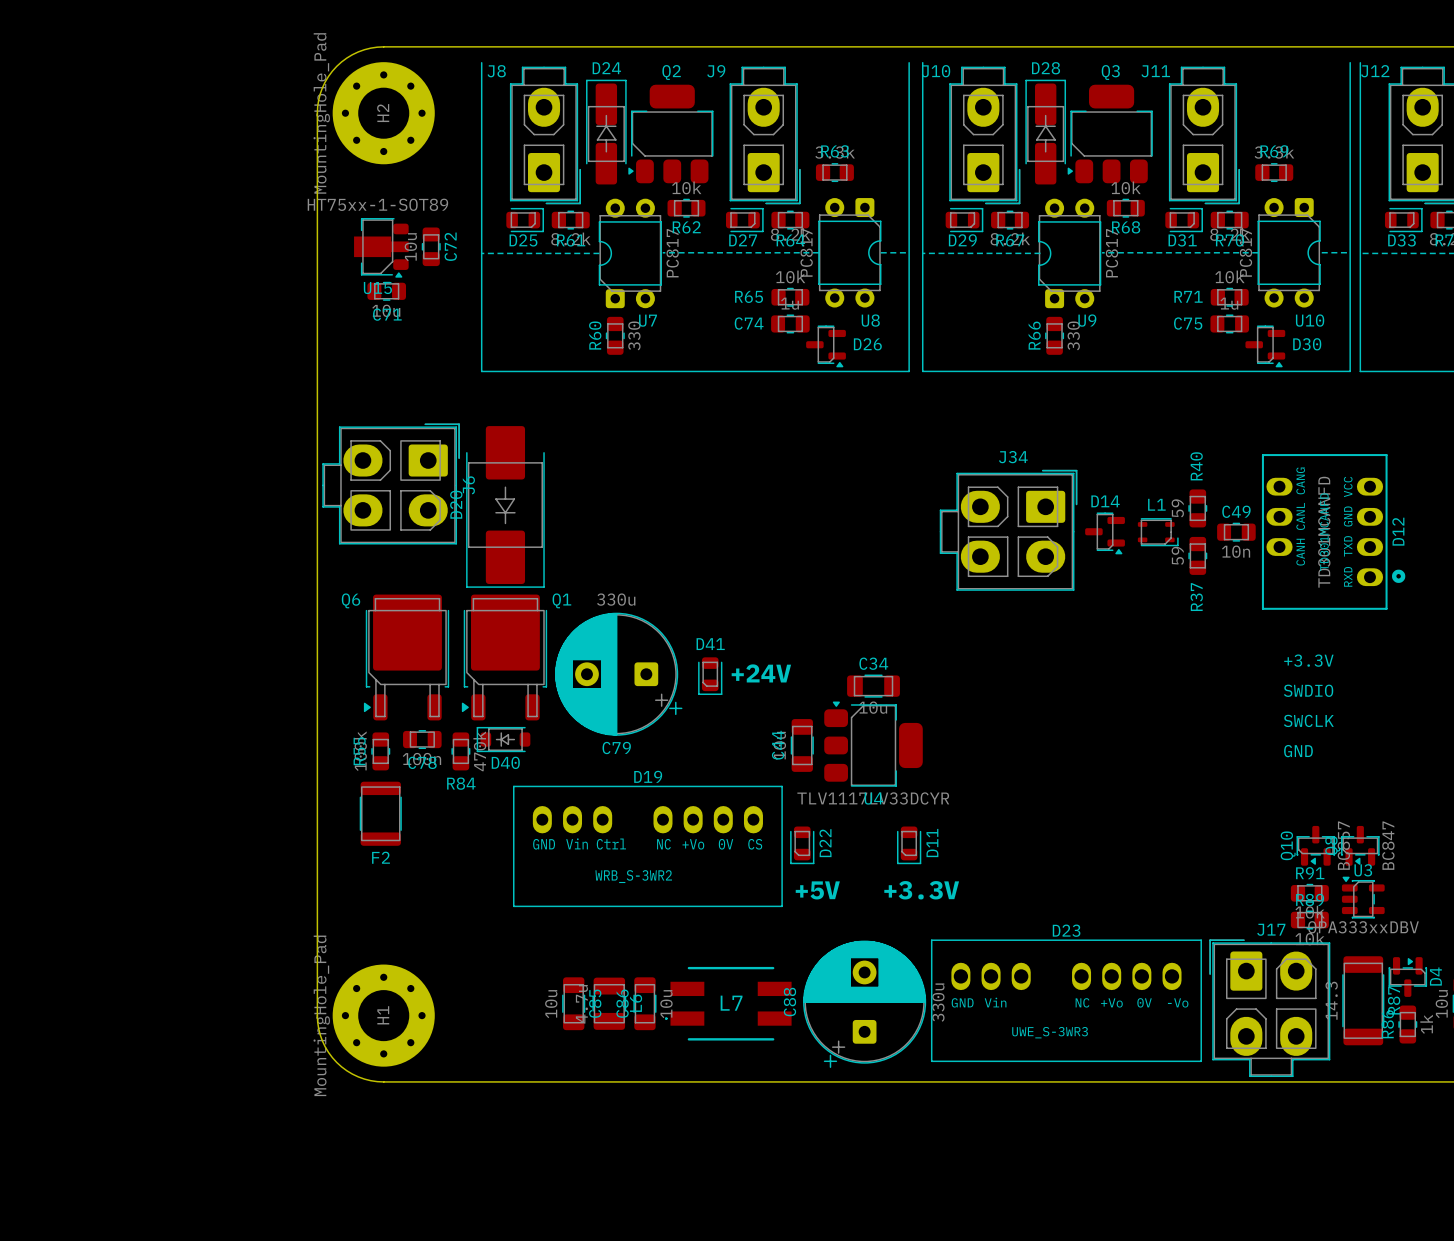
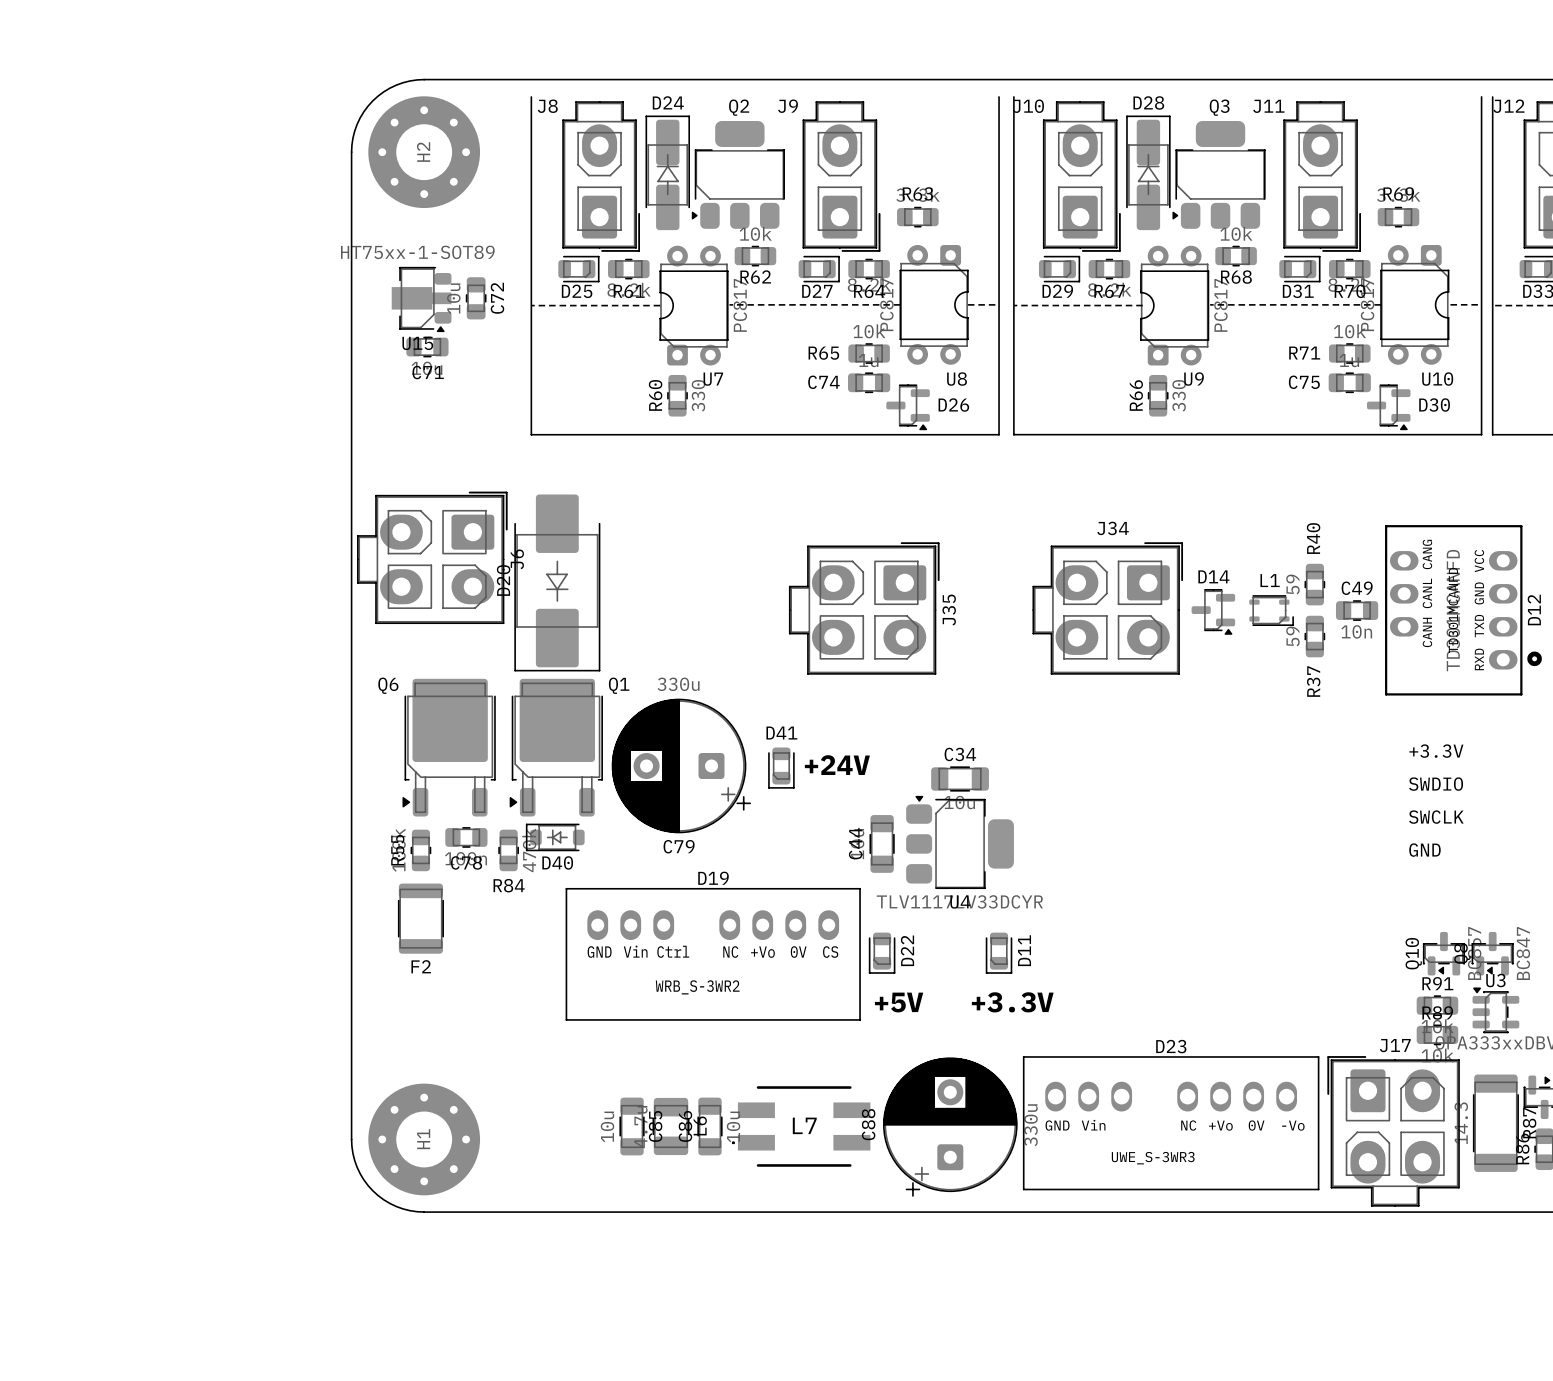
H2 value: MountingHole_Pad (321, 113) -> none
J35: none -> (864, 608)
H1 value: MountingHole_Pad (321, 1015) -> none

